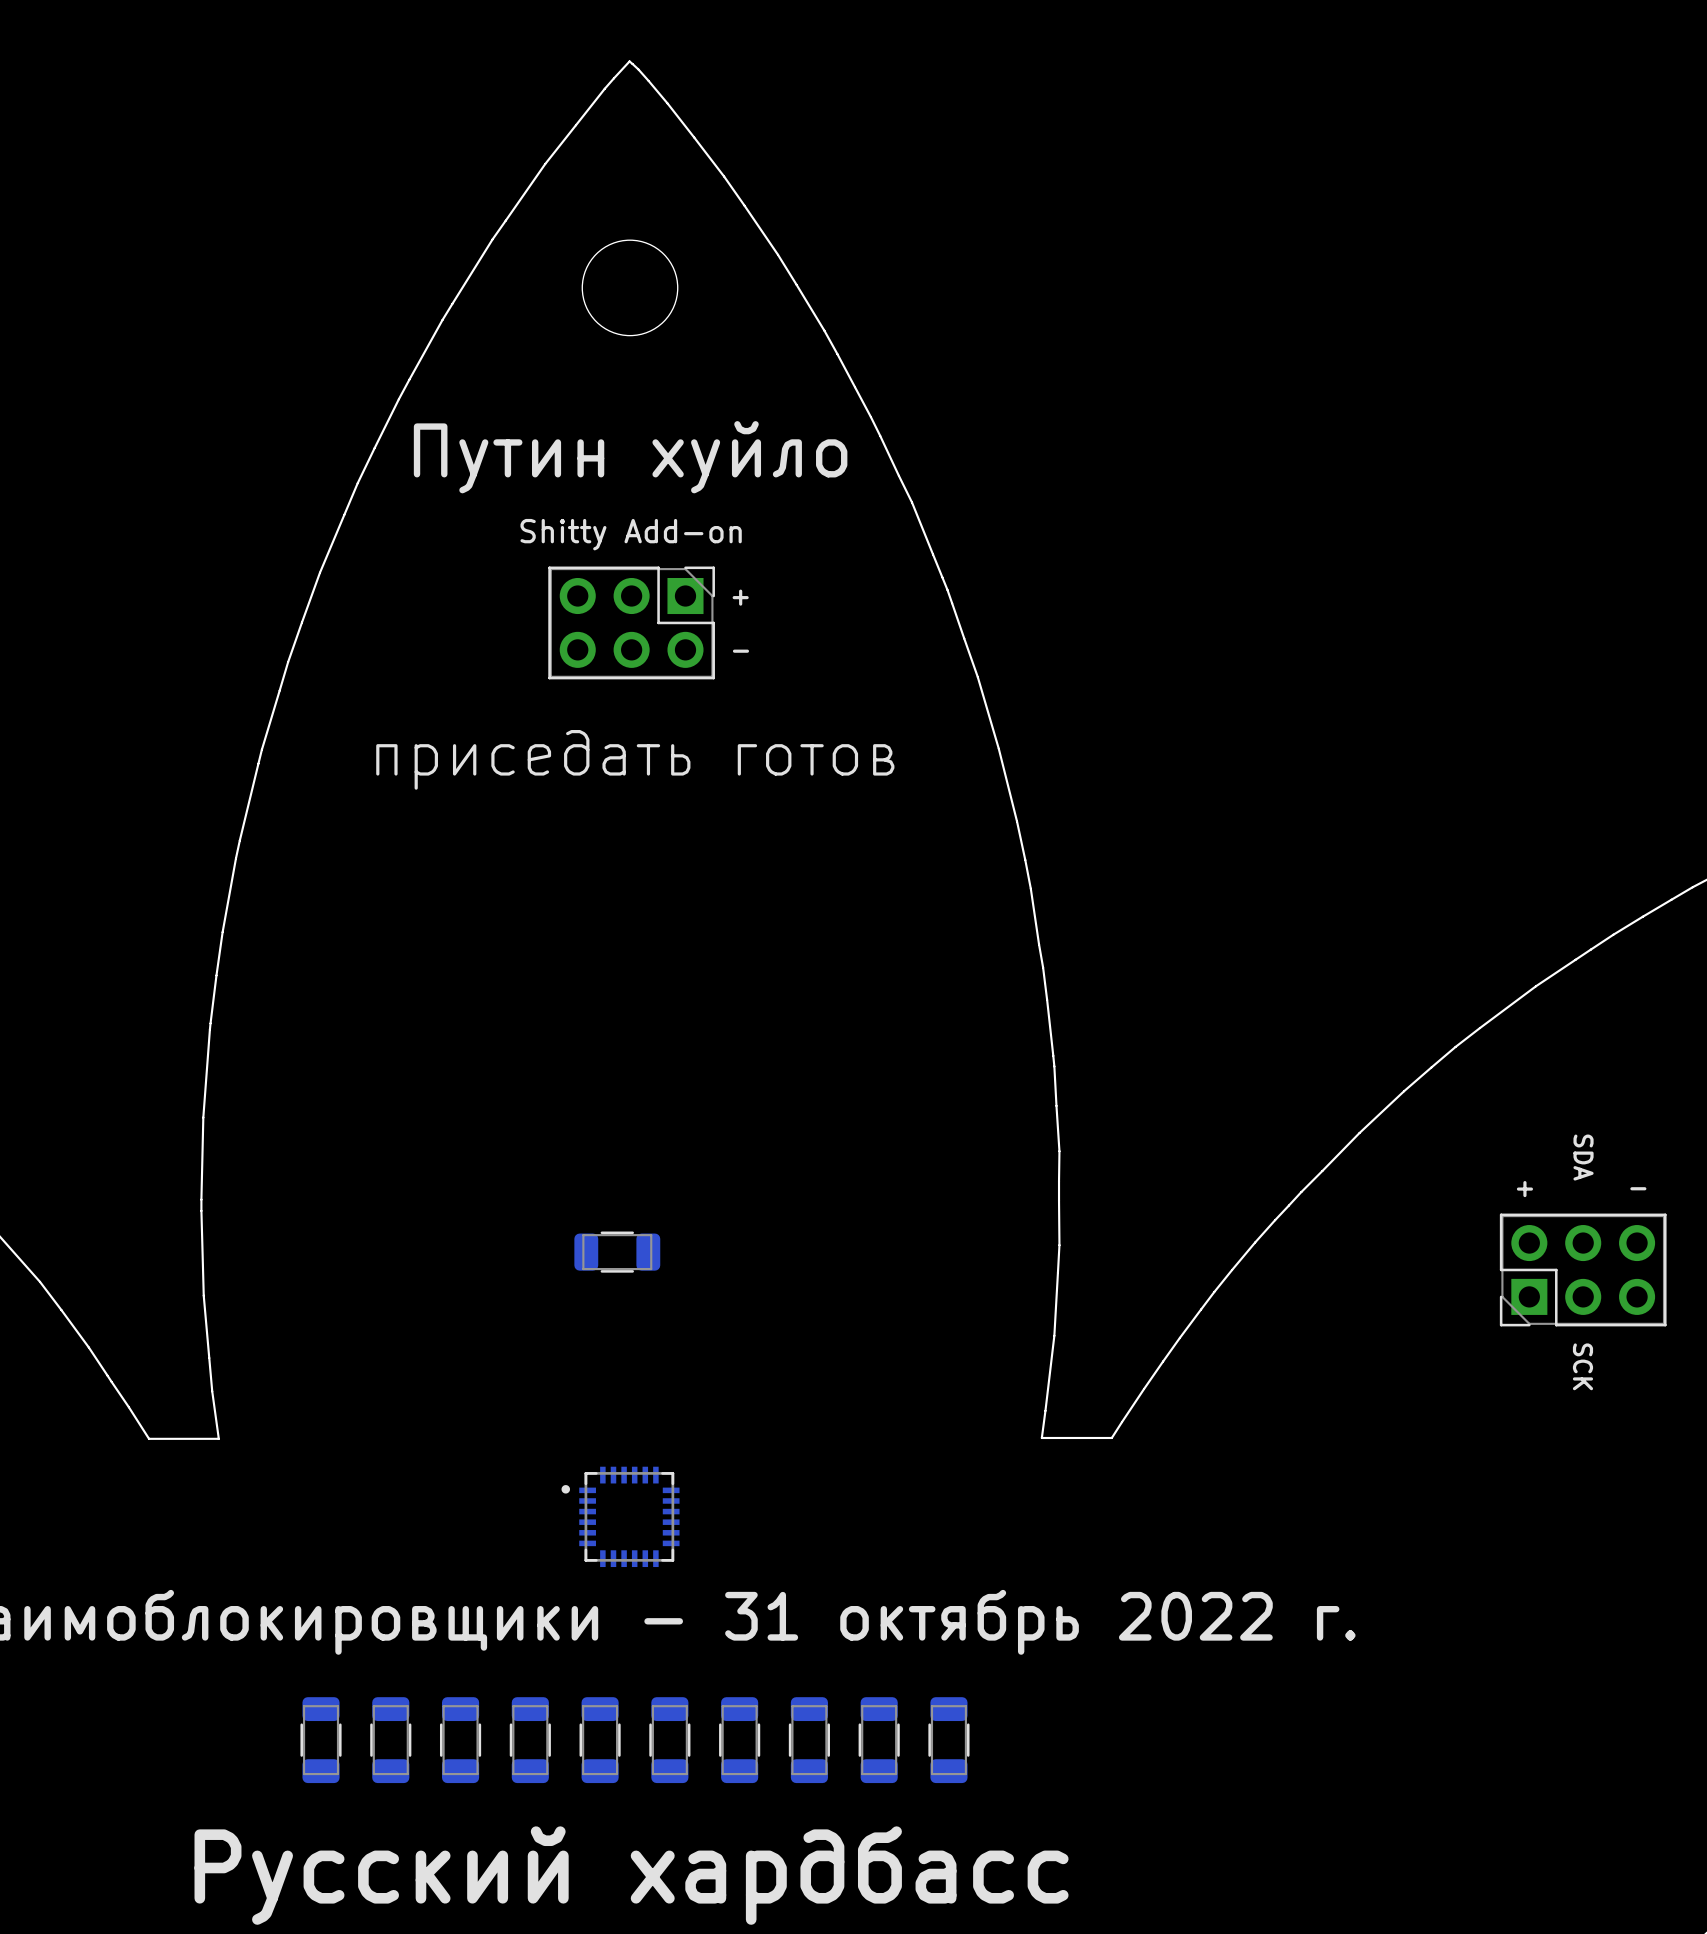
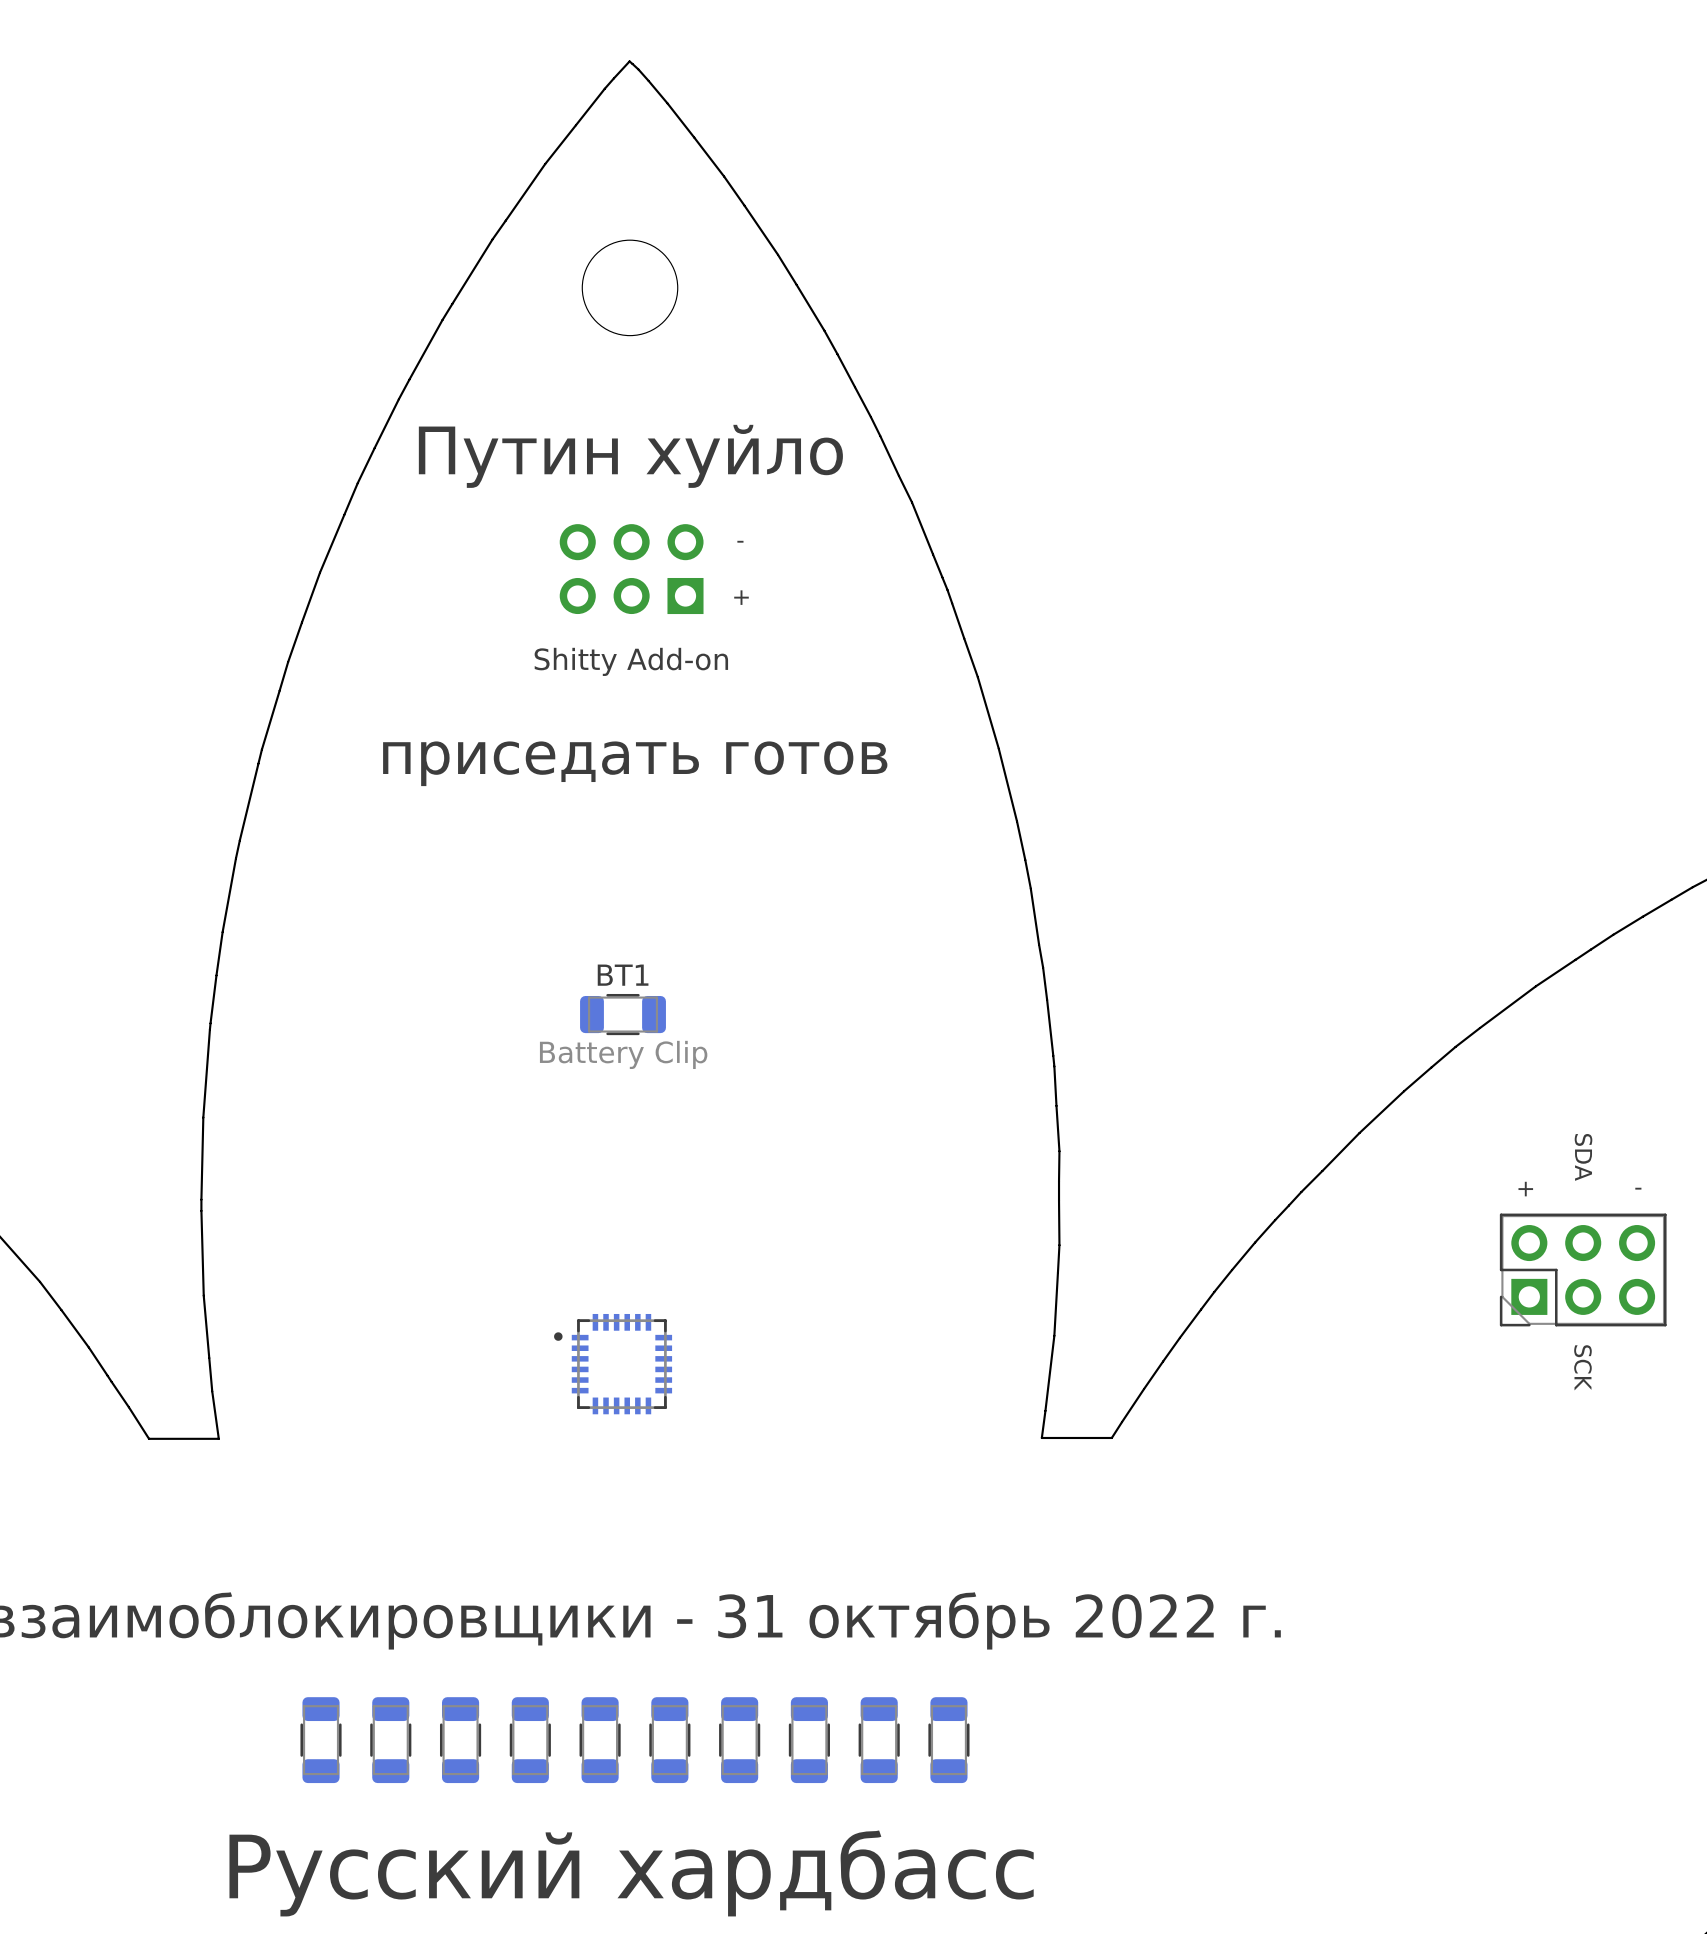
part side: bottom (631, 622) -> top (631, 569)
text position: - (740, 651) -> - (740, 541)
BT1: none -> Battery Clip (623, 1014)
part: (617, 1252) -> none
part position: (620, 1516) -> (613, 1364)

